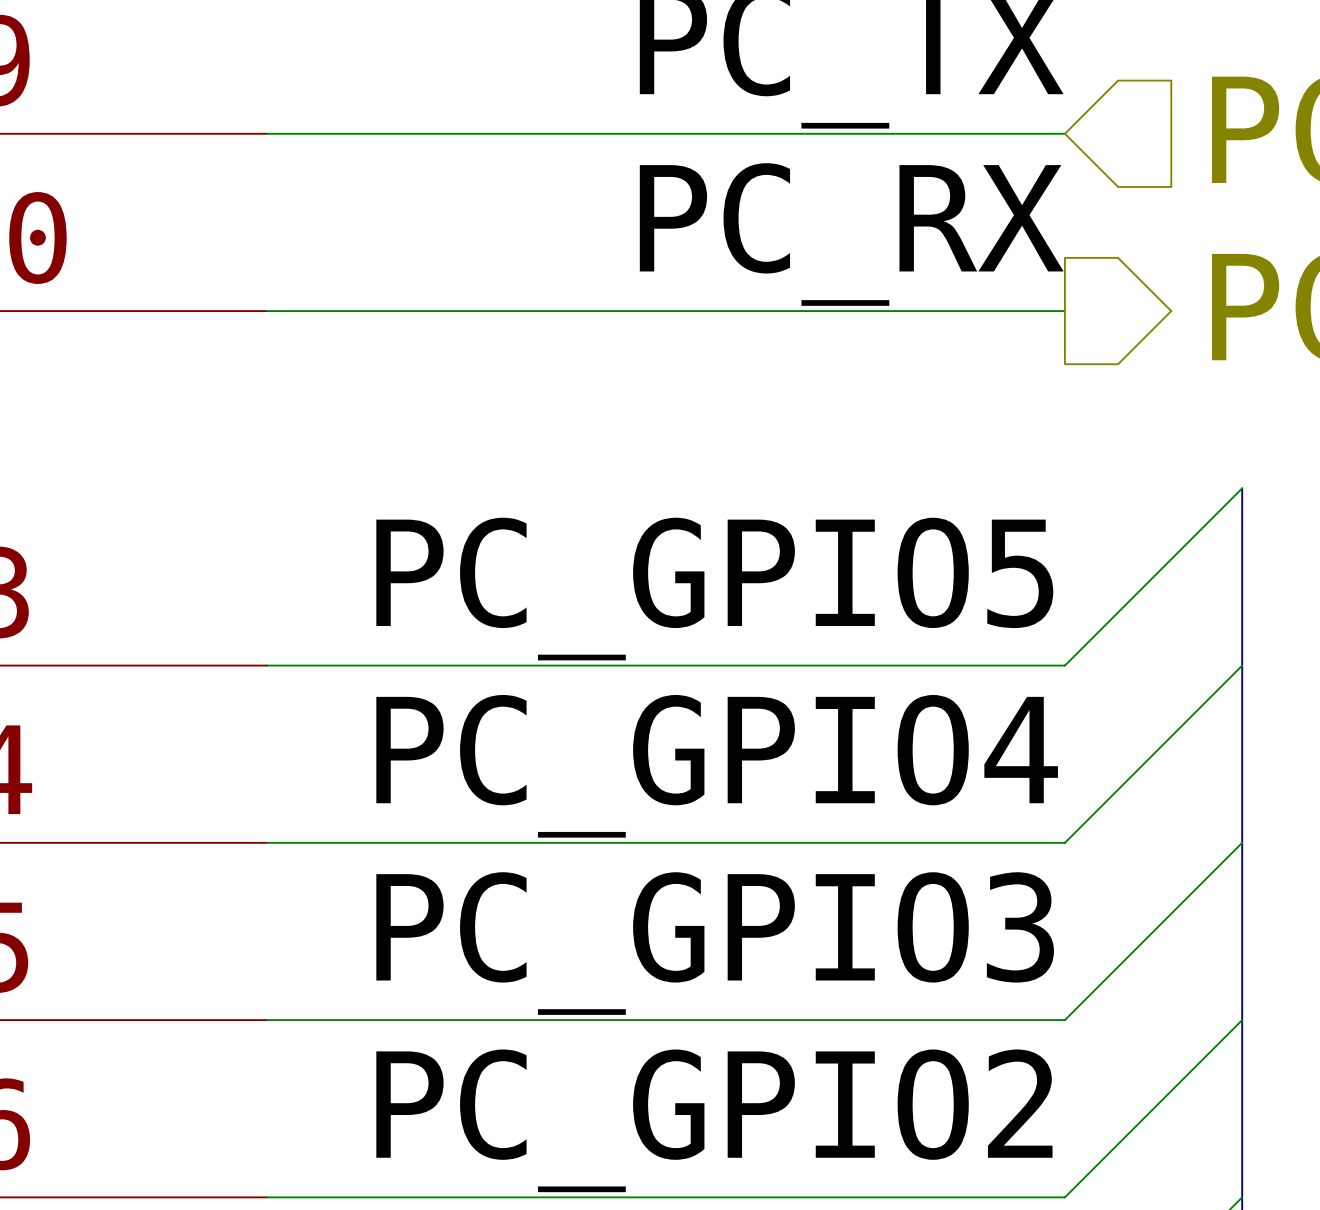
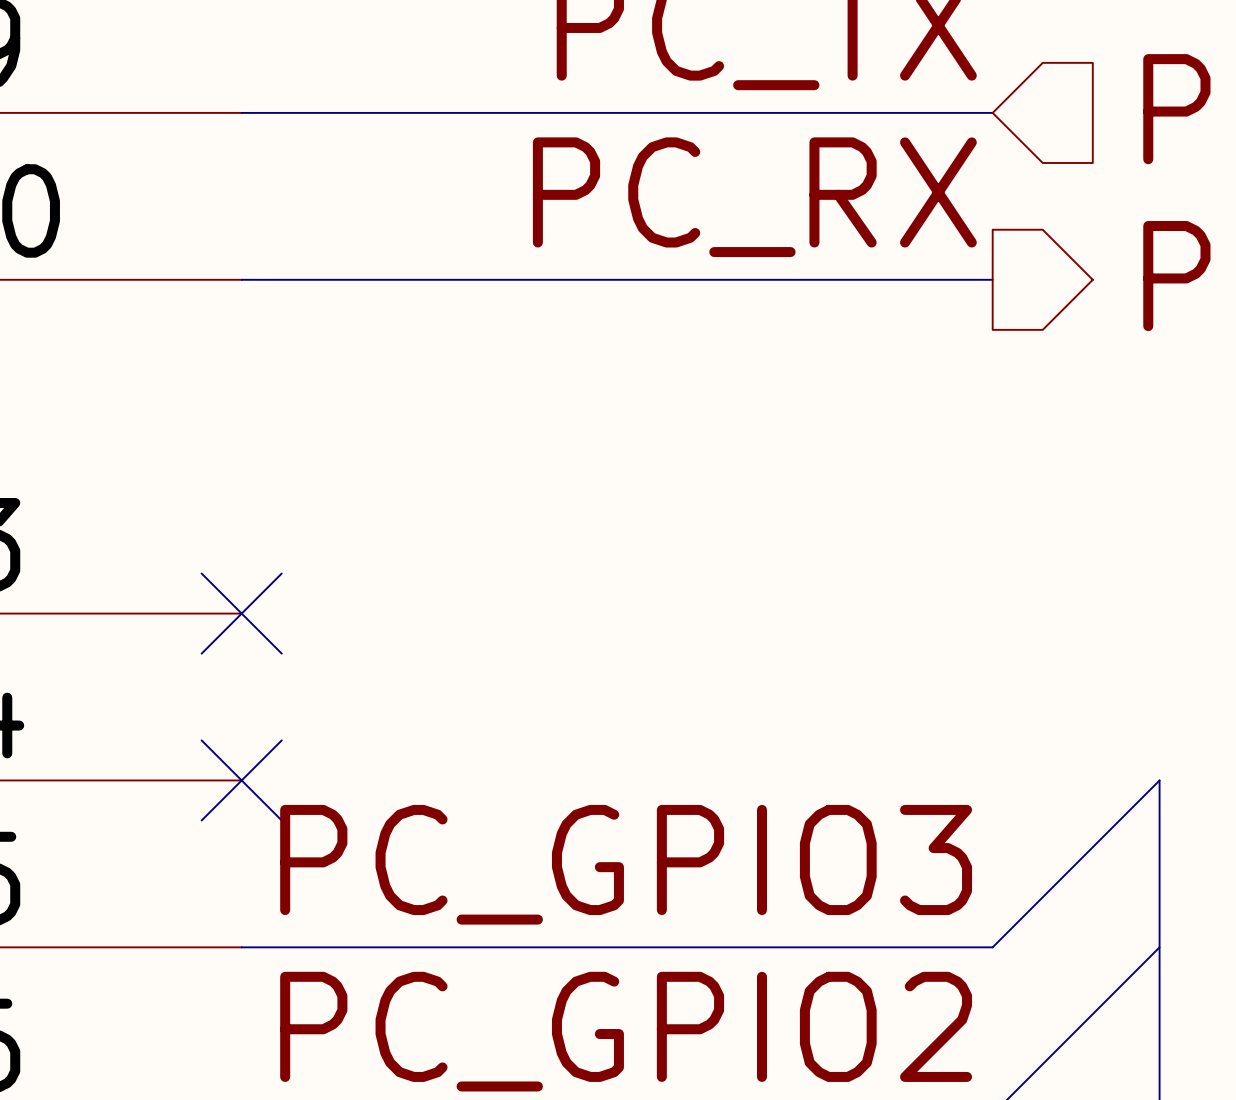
wire: (1242, 488) (1064, 665) (267, 665) -> none
bus: (1242, 488) (1242, 842) -> none
label: PC_GPIO5 (714, 589) -> none
no-connect mark: none -> (241, 613)
wire: (1242, 665) (1064, 842) (267, 842) -> none
label: PC_GPIO4 (717, 766) -> none
no-connect mark: none -> (241, 780)

